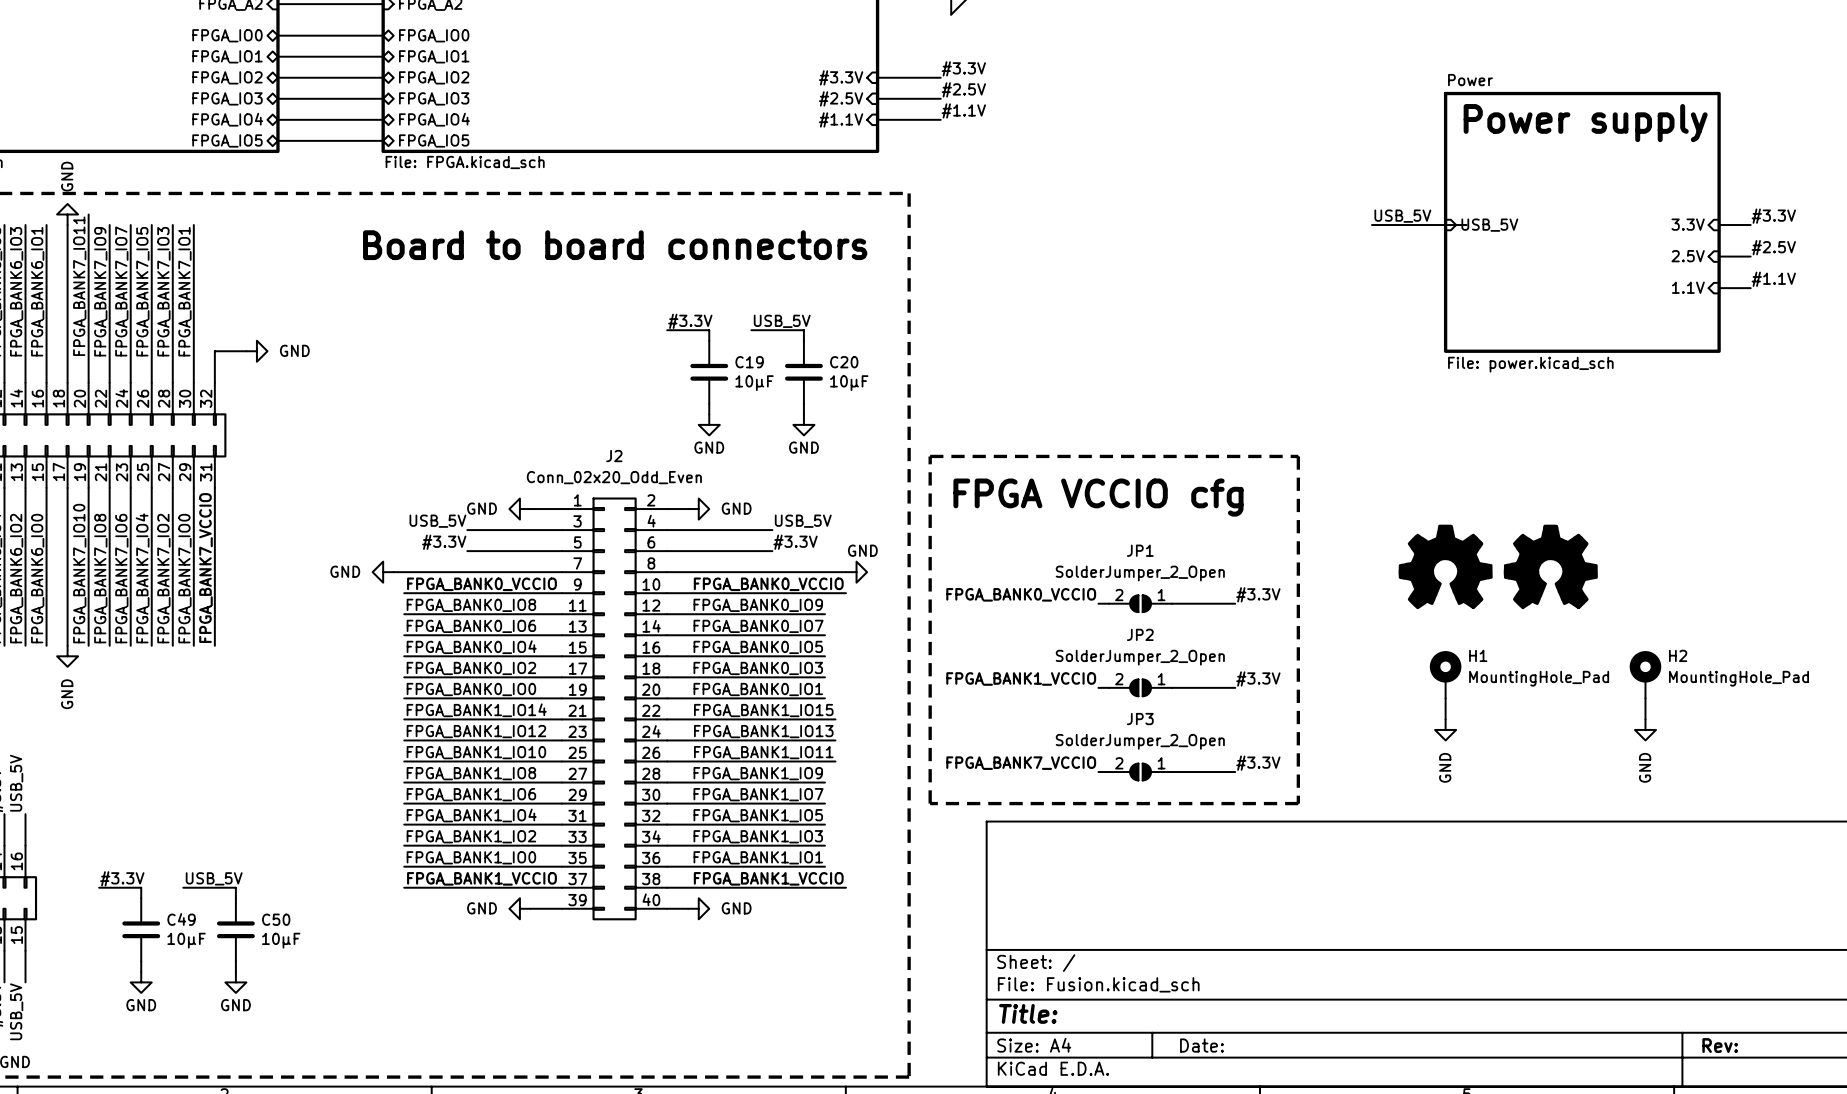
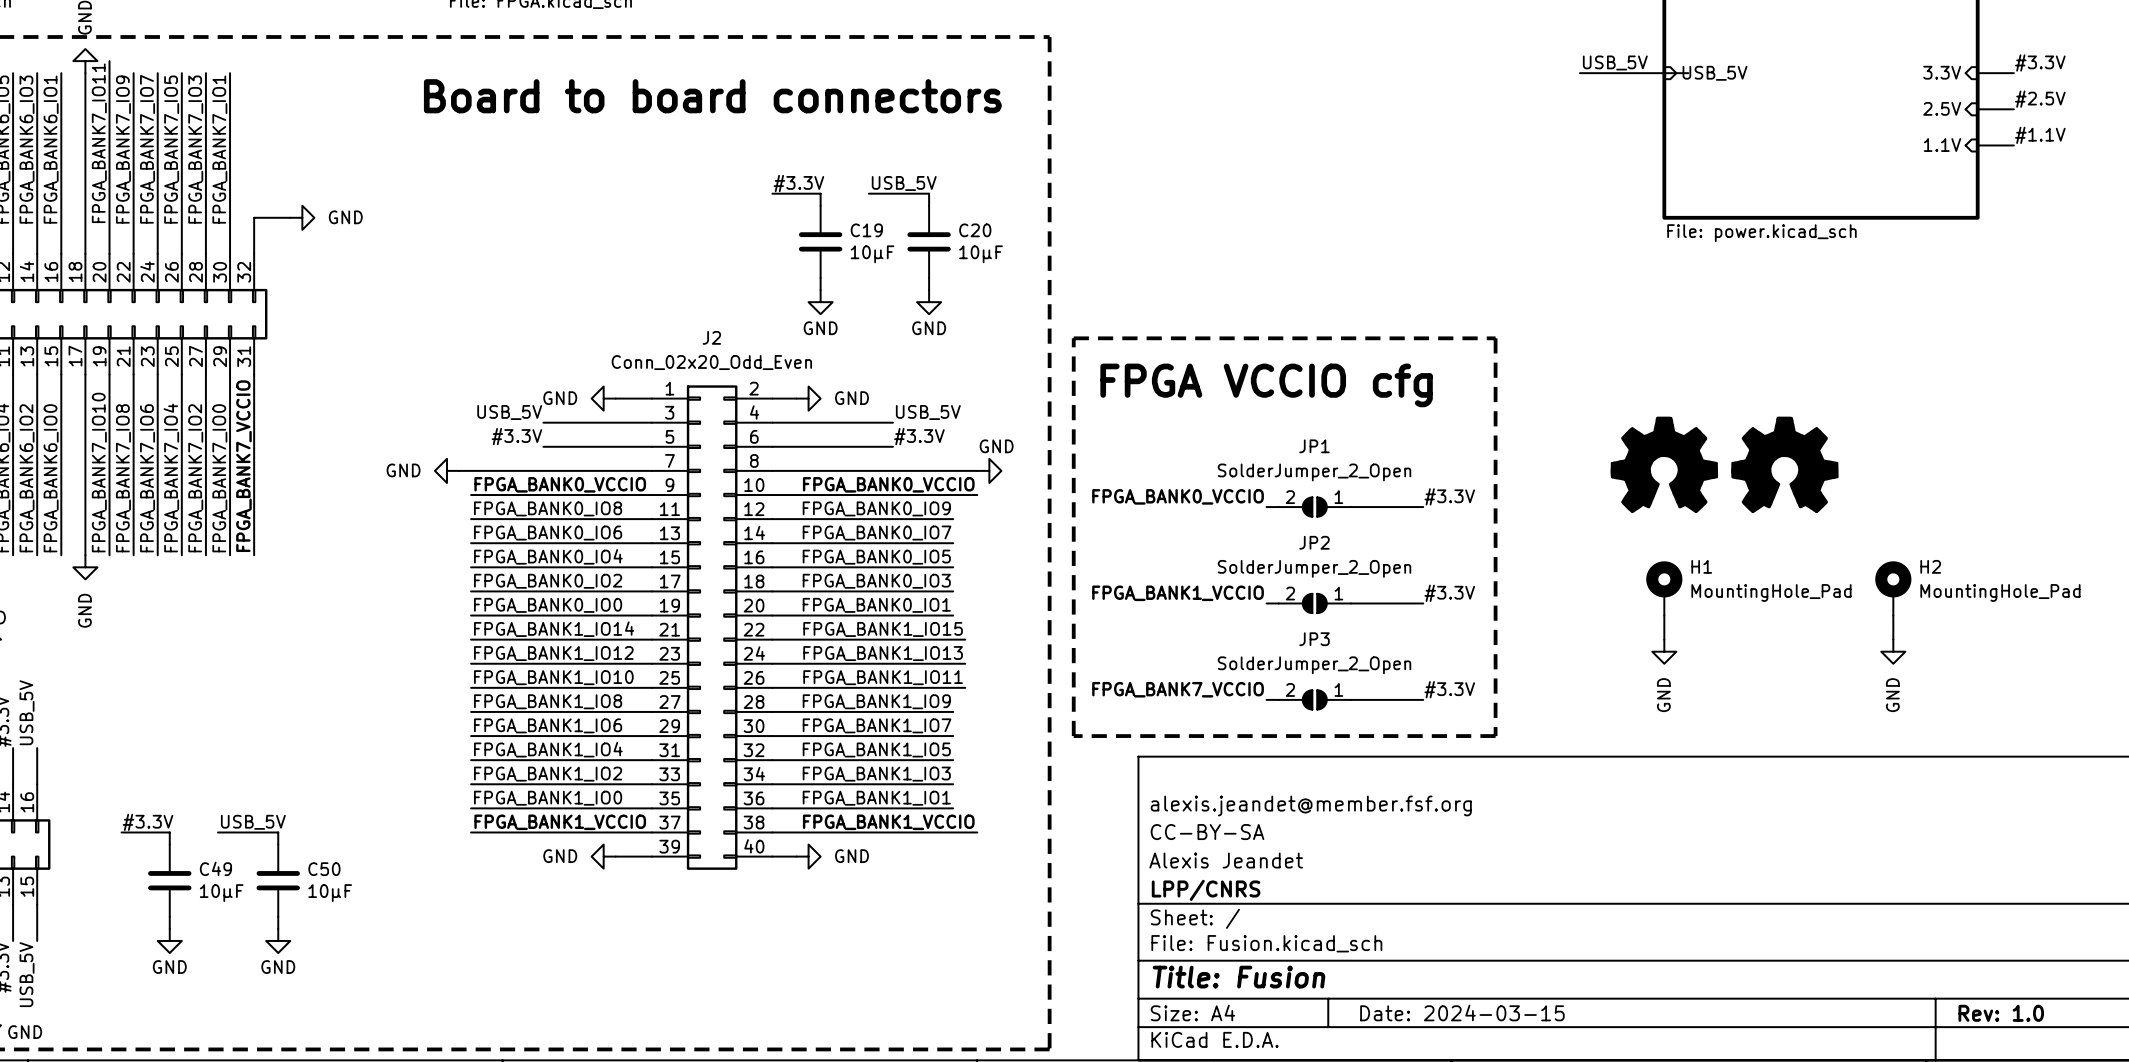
title block: none -> alexis.jeandet@member.fsf.org (1311, 805)
title block: none -> CC-BY-SA (1207, 832)
title block: none -> Alexis Jeandet (1226, 860)
title block: none -> LPP/CNRS (1206, 890)
title block: Title: (1028, 1013) -> Title: Fusion (1239, 977)
title block: Date: (1201, 1045) -> Date: 2024-03-15 (1462, 1012)
title block: Rev: (1720, 1045) -> Rev: 1.0 (2001, 1013)

